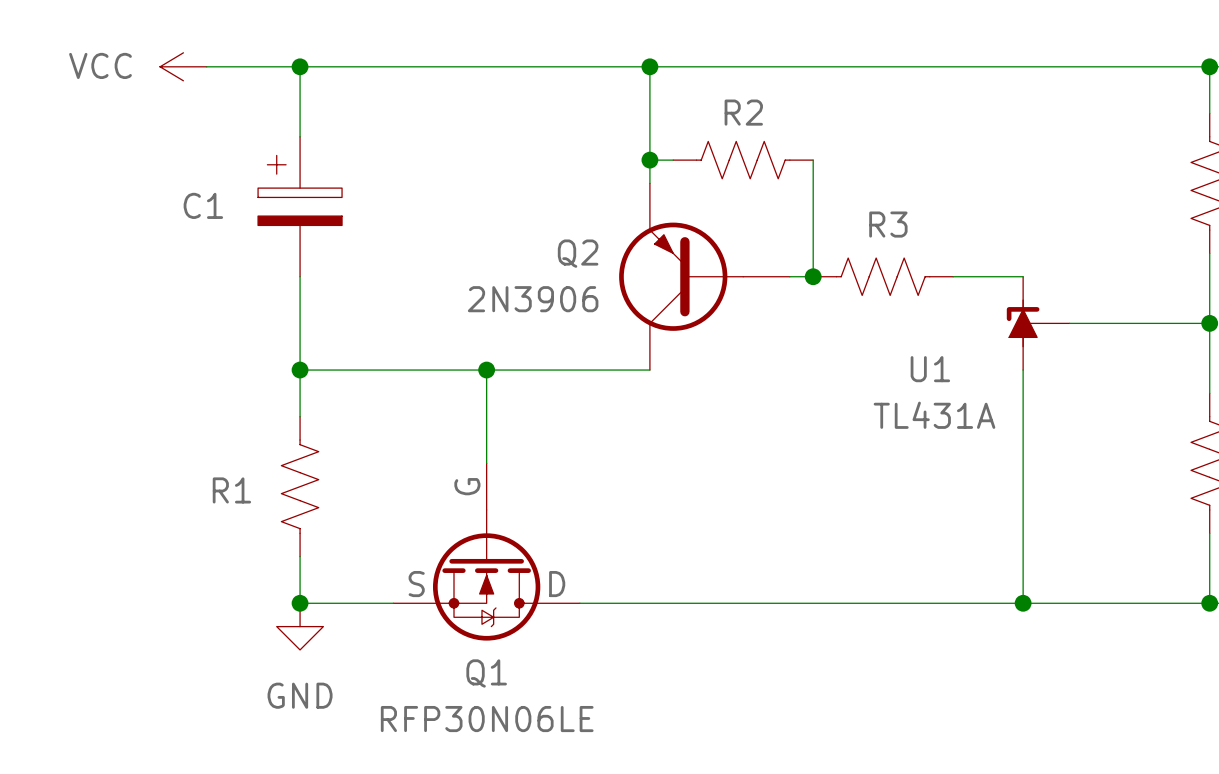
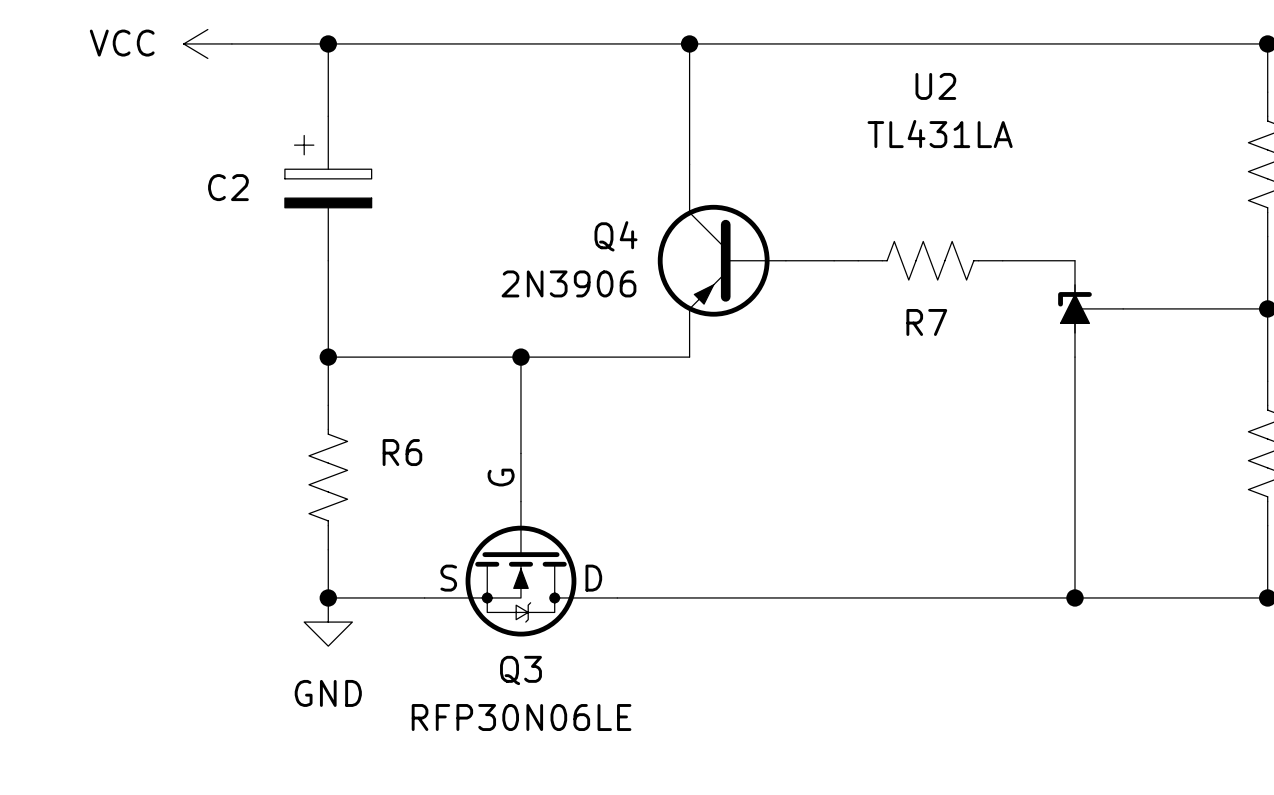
wire: (649, 160) (673, 160) -> none
junction: (649, 160) -> none
R2: (743, 160) -> none
wire: (813, 160) (813, 276) -> none
C1 name: C1 (203, 205) -> C2 (228, 187)
R3 name: R3 (888, 224) -> R7 (926, 322)
Q2: 2N3906 (704, 276) -> none
Q4: none -> 2N3906 (745, 260)
junction: (813, 276) -> none
U1 name: U1 (930, 369) -> U2 (935, 86)
U1 value: TL431A (934, 415) -> TL431LA (940, 134)
R1 name: R1 (231, 490) -> R6 (402, 452)
Q1 name: Q1 (486, 673) -> Q3 (520, 670)

